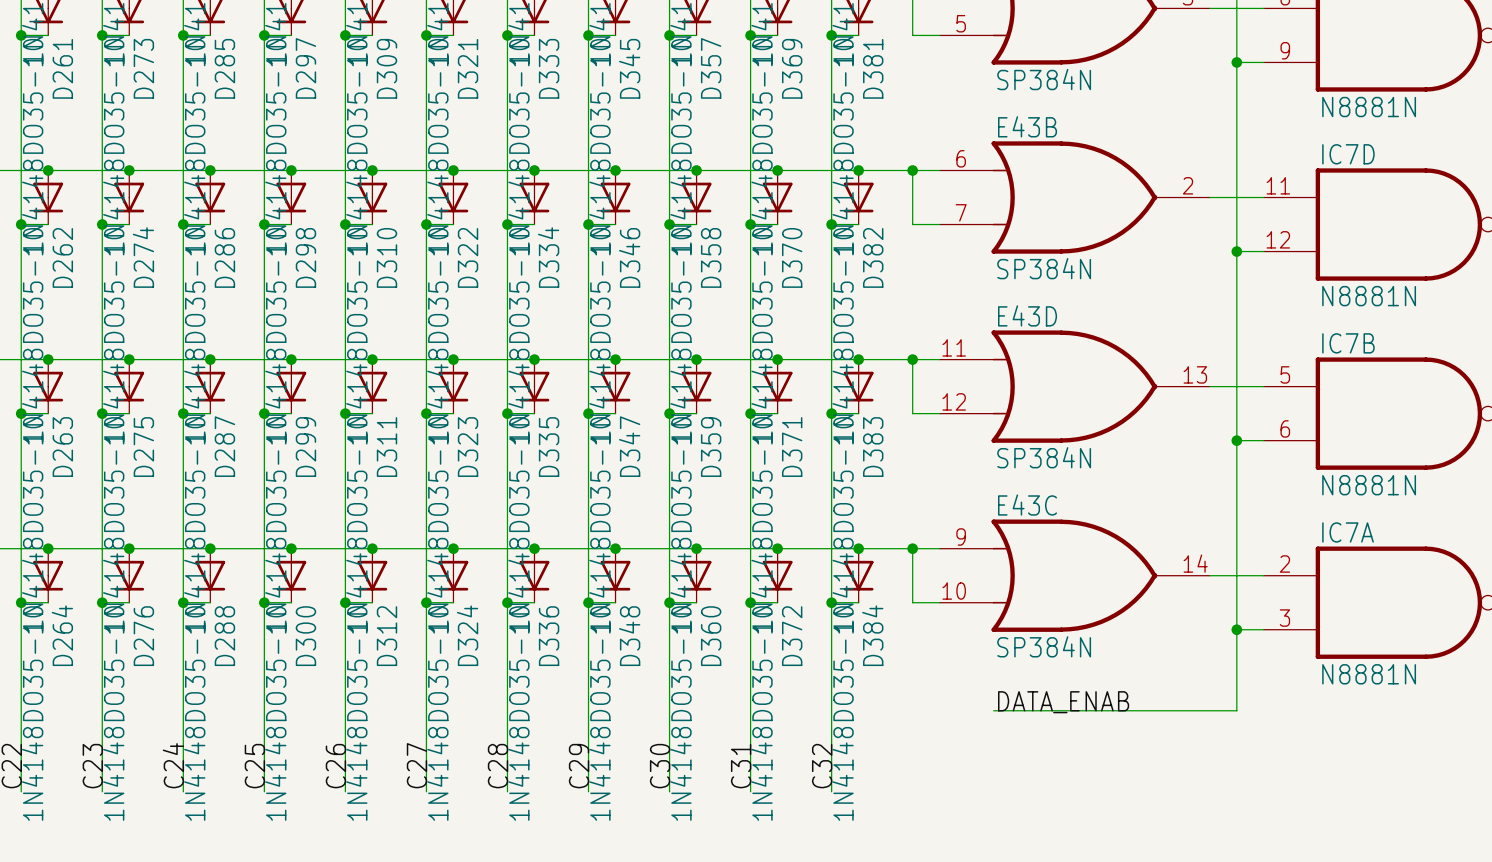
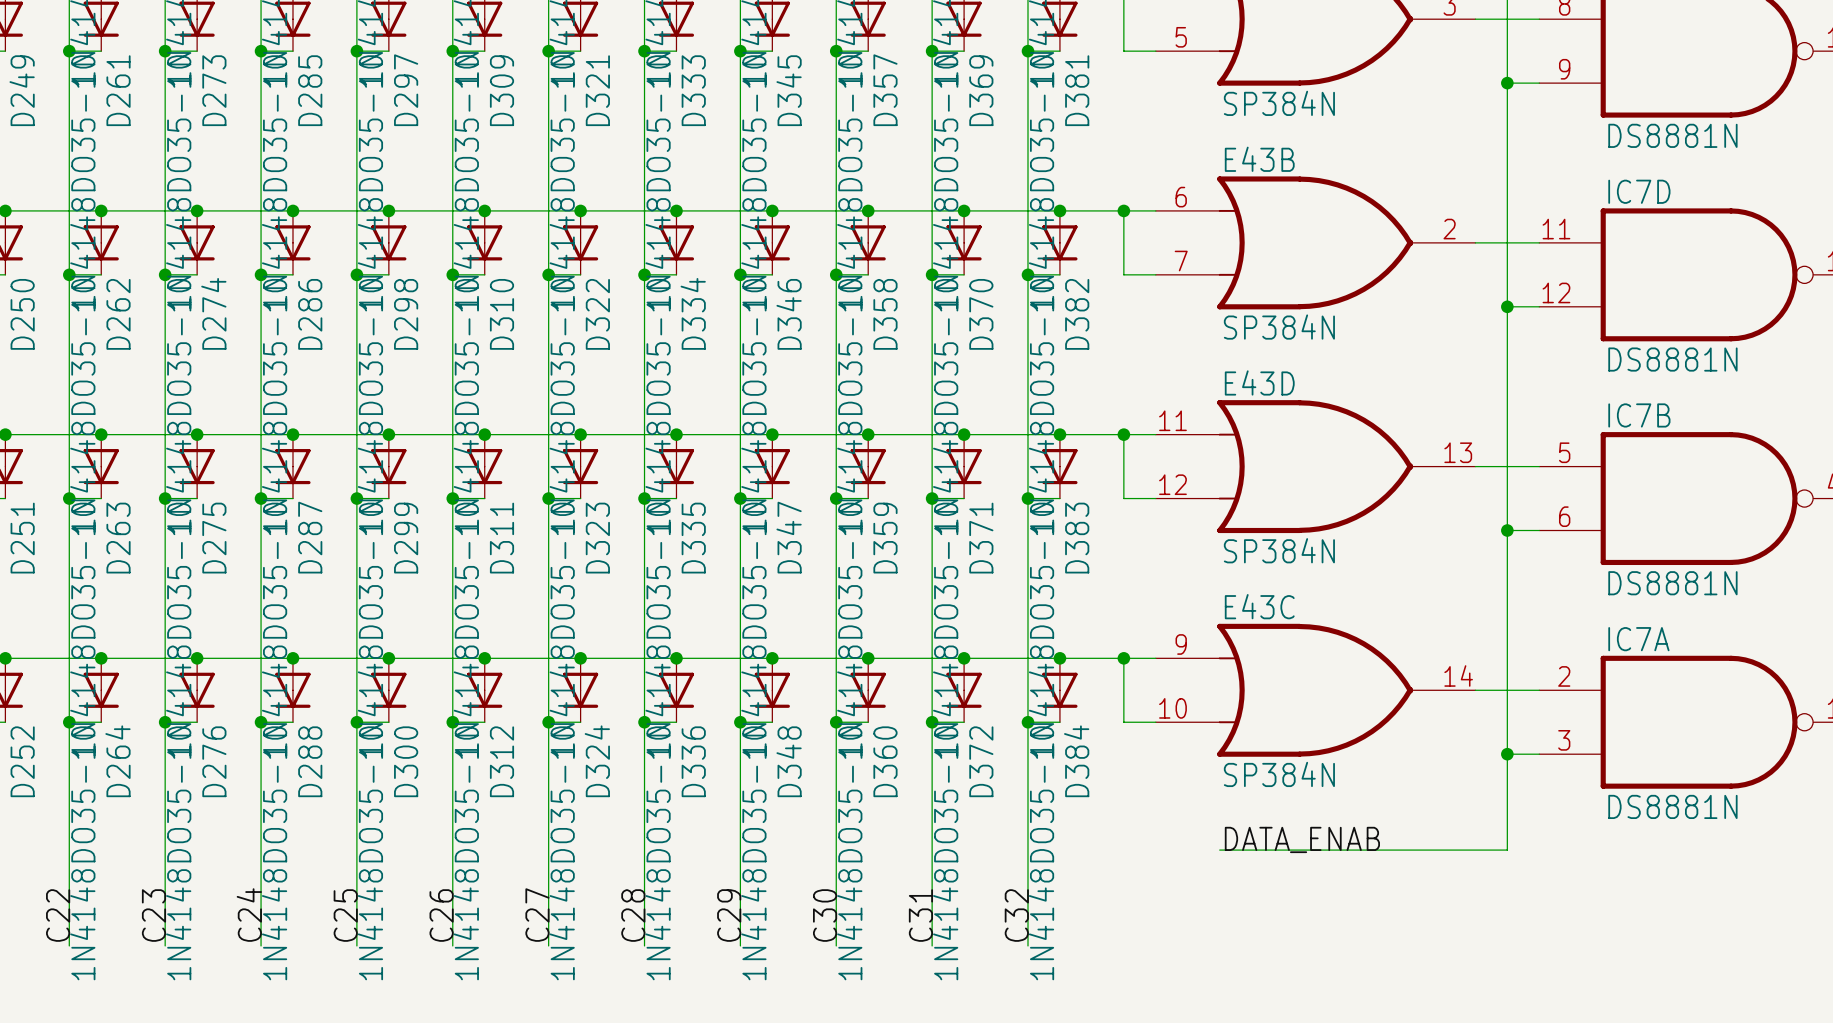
part value: N8881N (1369, 107) -> DS8881N (1672, 135)
IC7D value: N8881N (1369, 296) -> DS8881N (1672, 359)
IC7B value: N8881N (1369, 485) -> DS8881N (1672, 583)
IC7A value: N8881N (1369, 674) -> DS8881N (1672, 806)

